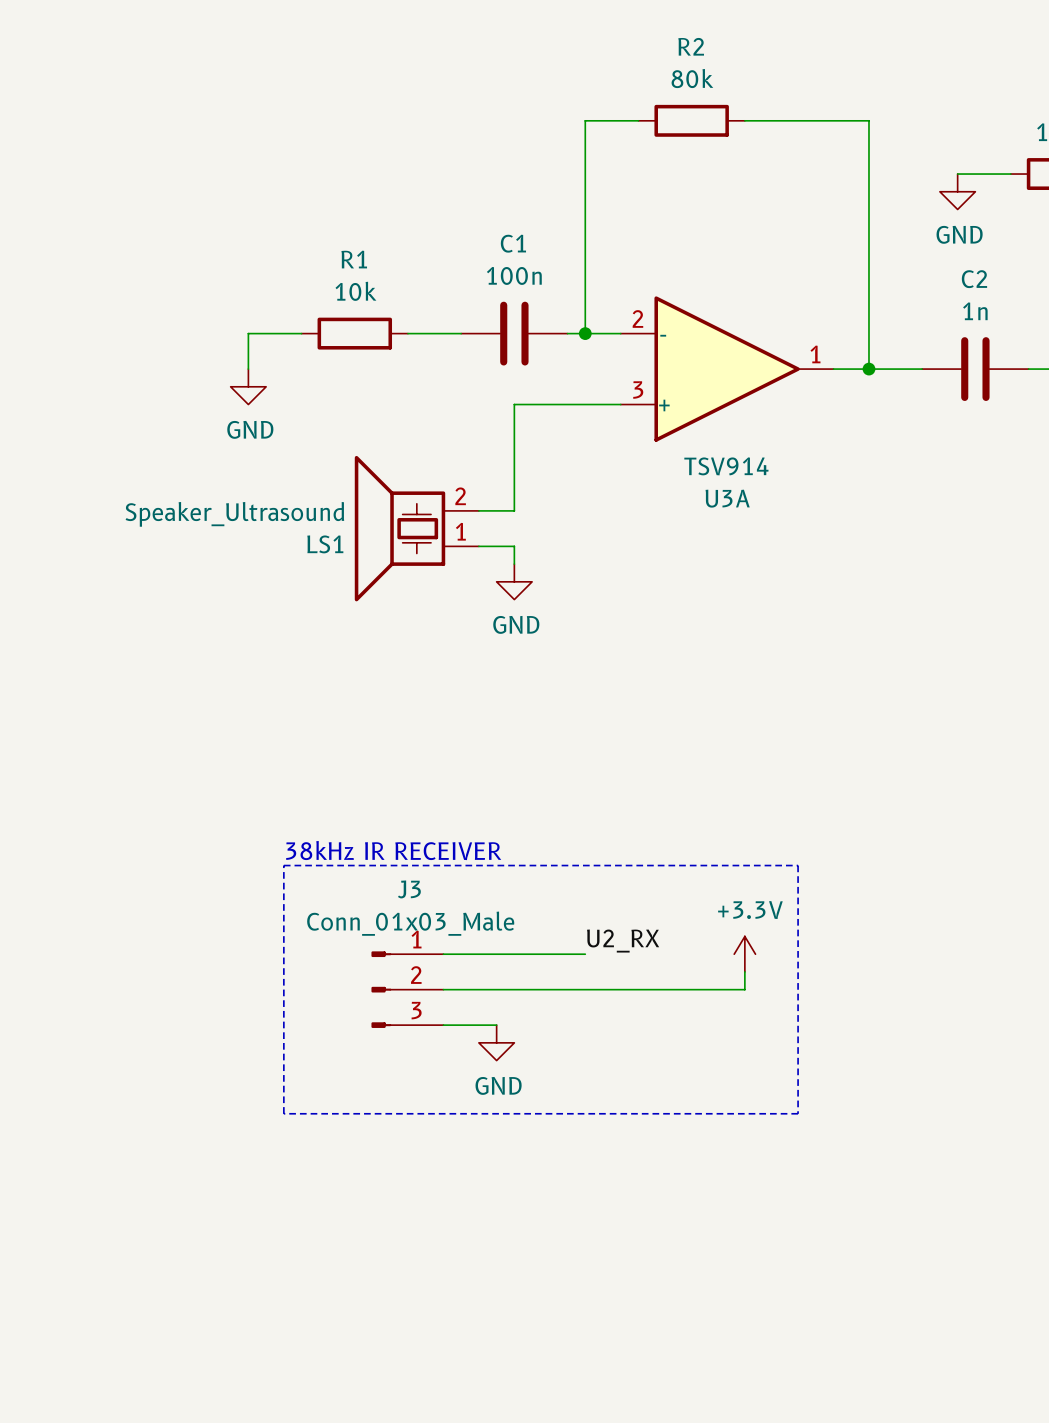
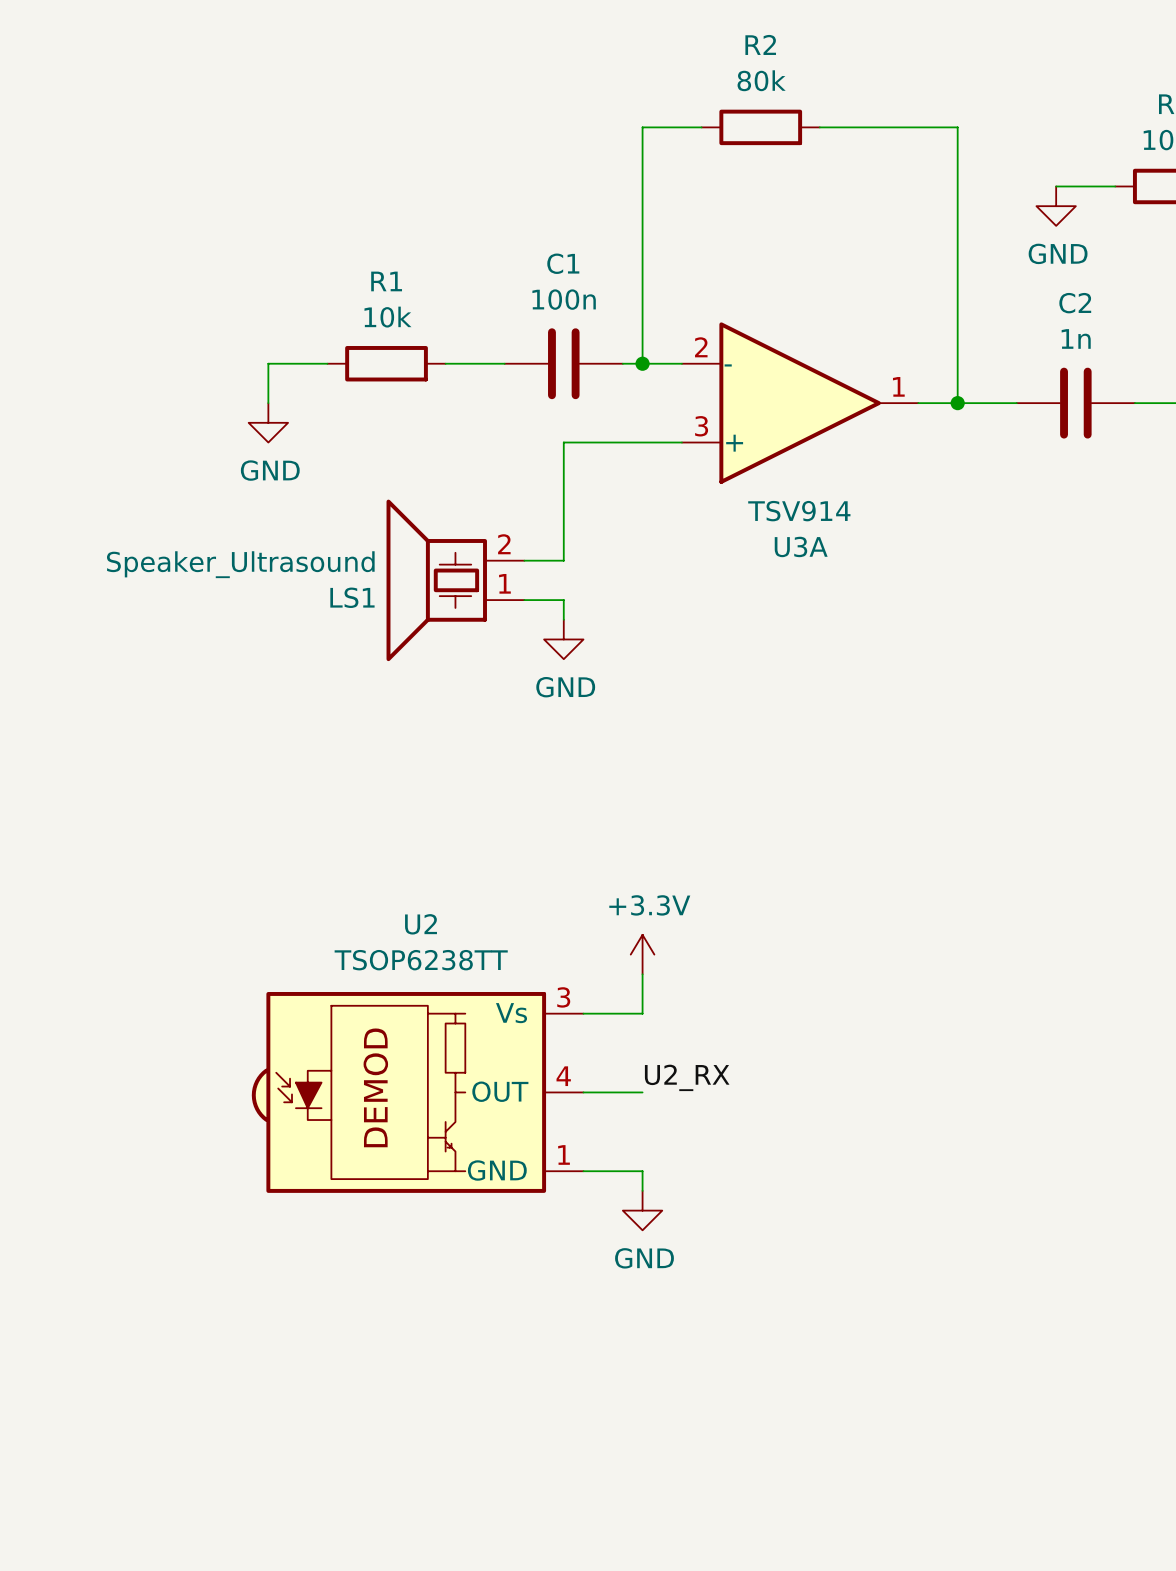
text: 38kHz IR RECEIVER (393, 850) -> none
line: (283, 865) (798, 865) (798, 1113) (283, 1113) (283, 865) -> none
wire: none -> (642, 974) (642, 1013) (583, 1013)
label position: U2_RX (623, 941) -> U2_RX (687, 1077)
wire: (443, 954) (585, 954) -> none
power symbol position: +3.3V (744, 954) -> +3.3V (642, 954)
wire: (744, 971) (744, 989) (585, 989) -> none
U2: none -> TSOP6238TT (417, 1092)
J3: Conn_01x03_Male (407, 989) -> none
power symbol position: GND (496, 1042) -> GND (642, 1210)
wire: none -> (583, 1171) (642, 1171) (642, 1190)

